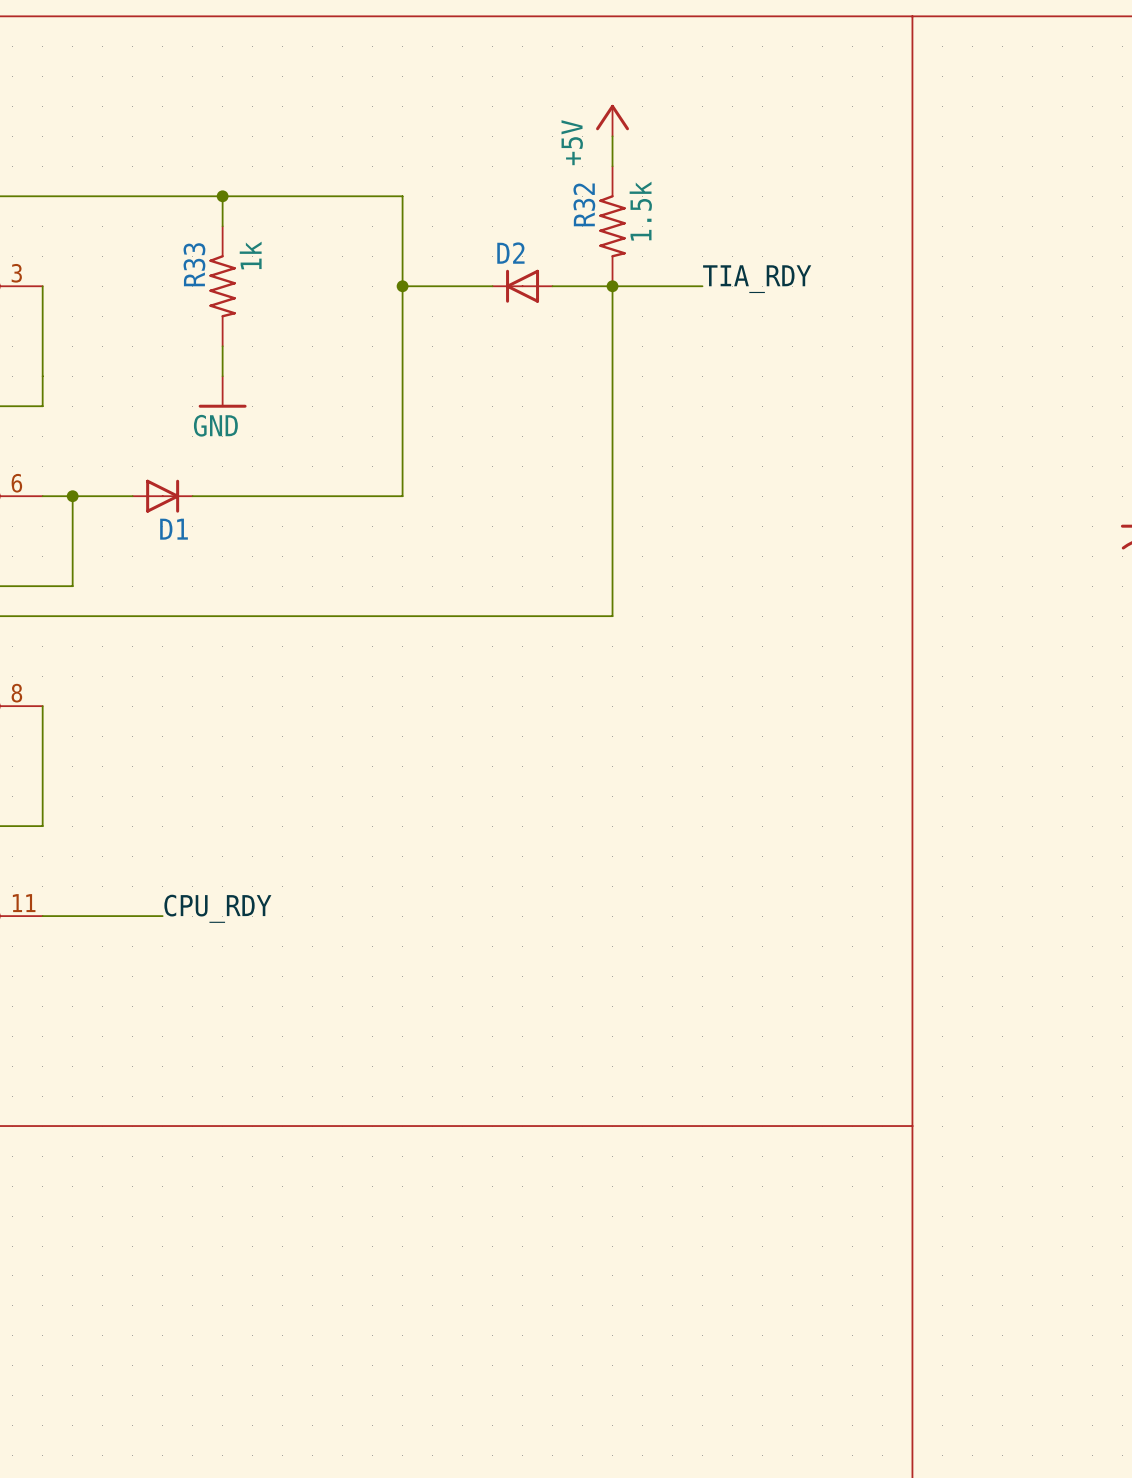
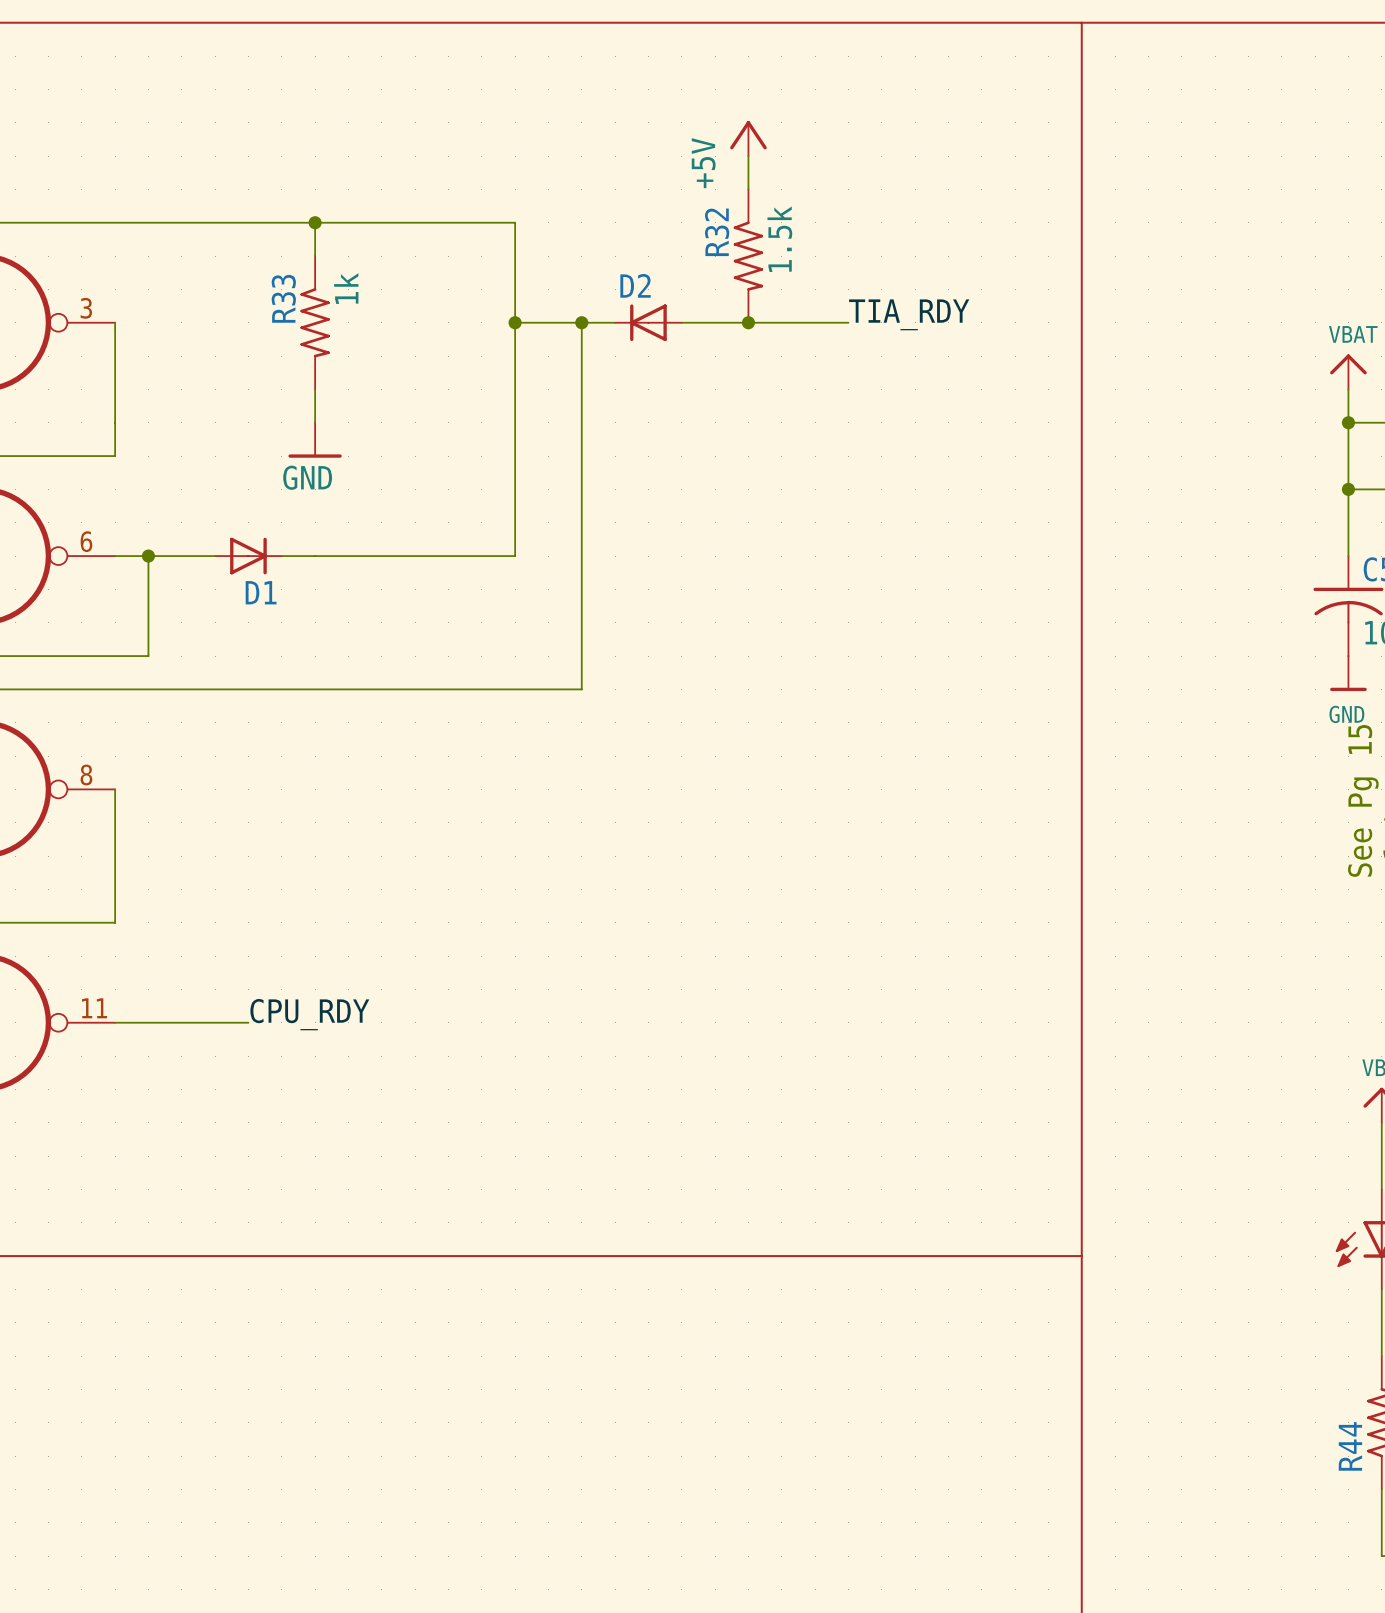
junction: none -> (581, 322)
wire: (612, 286) (612, 616) (462, 616) -> (581, 322) (581, 689)

